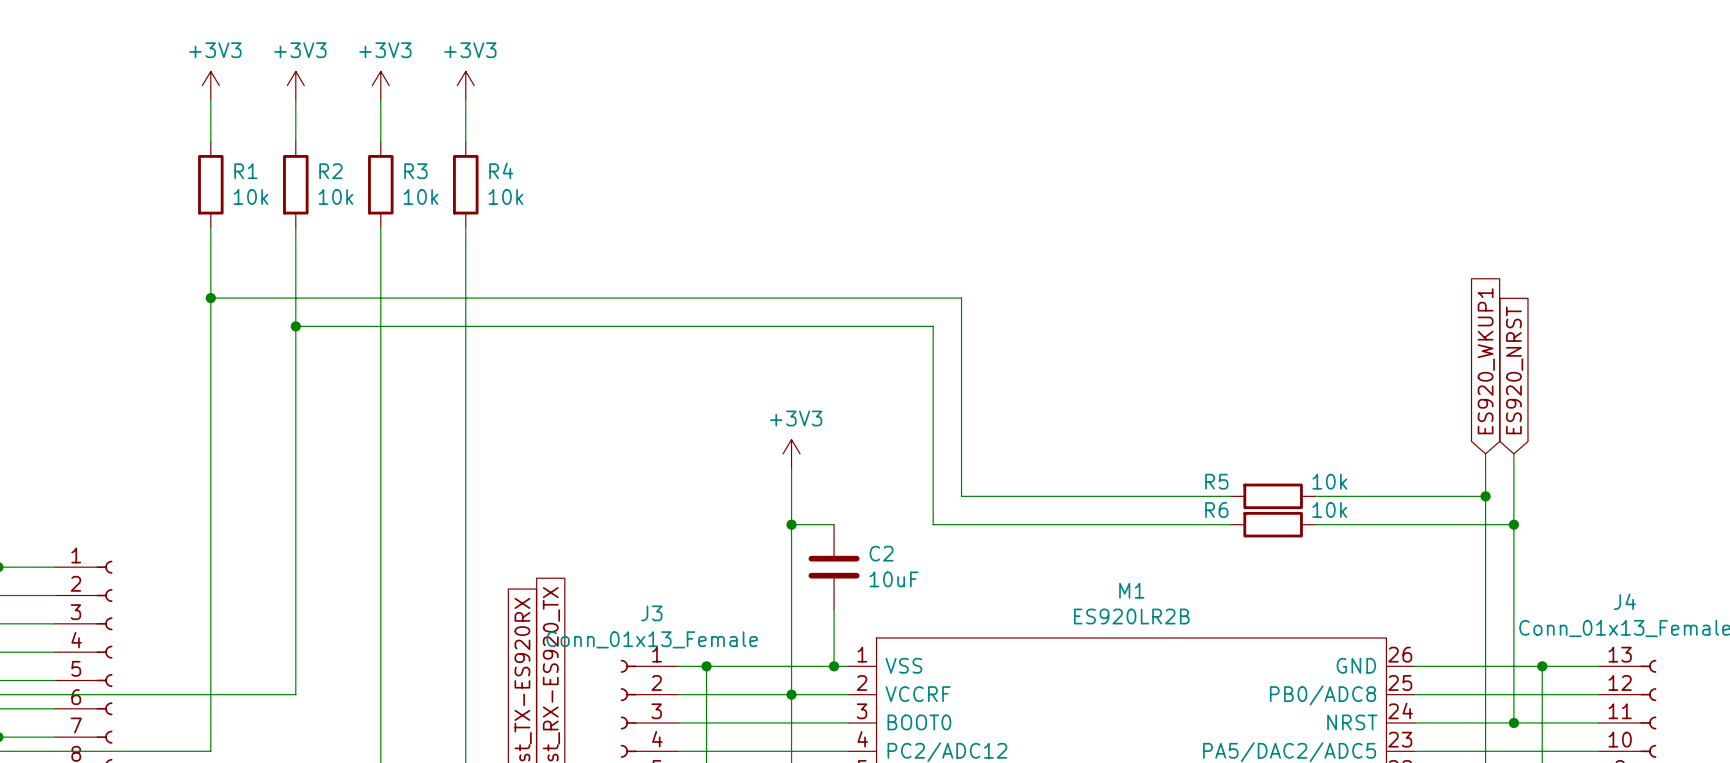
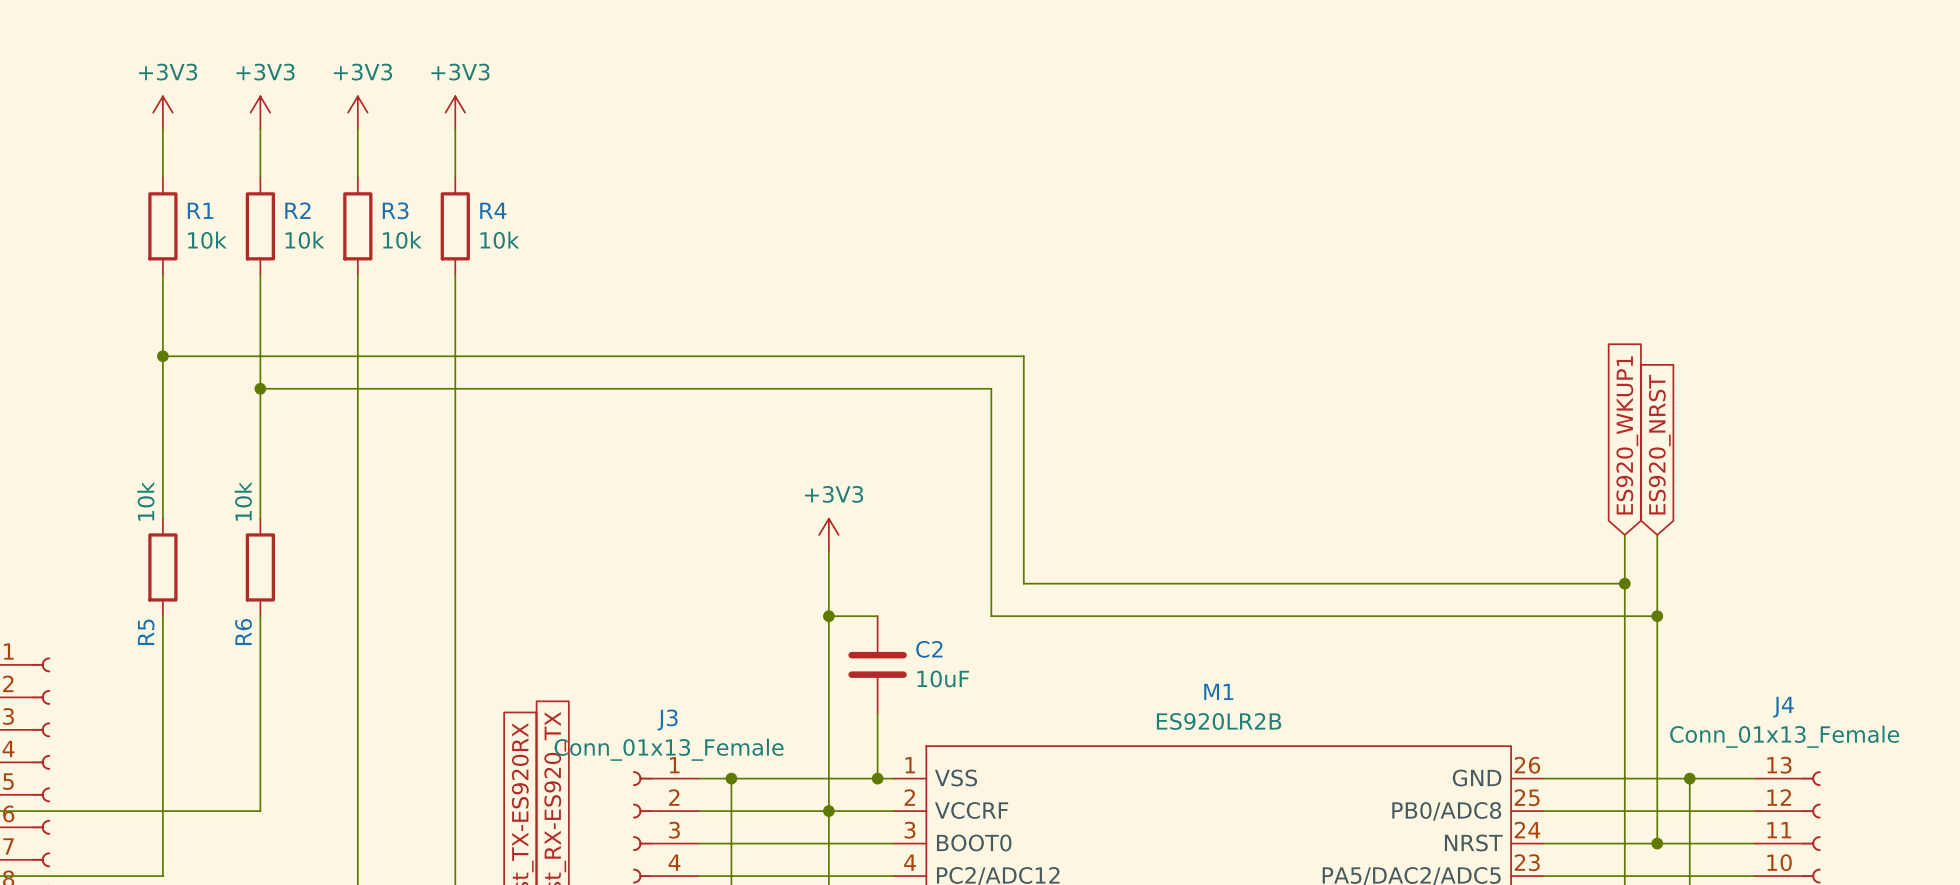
wire: (210, 439) (210, 524) -> none
wire: (295, 439) (295, 524) -> none
R5 name position: R5 (1216, 481) -> R5 (146, 632)
R5 value position: 10k (1329, 481) -> 10k (145, 501)
wire: none -> (1332, 583) (1429, 583)
R5 rotation: 0° (1273, 496) -> 90° clockwise (162, 567)
R5 position: (1273, 496) -> (162, 567)
R6 name position: R6 (1216, 509) -> R6 (243, 632)
R6 value position: 10k (1329, 509) -> 10k (243, 501)
wire: none -> (1332, 616) (1429, 616)
R6 rotation: 0° (1273, 524) -> 90° clockwise (260, 567)
R6 position: (1273, 524) -> (260, 567)

